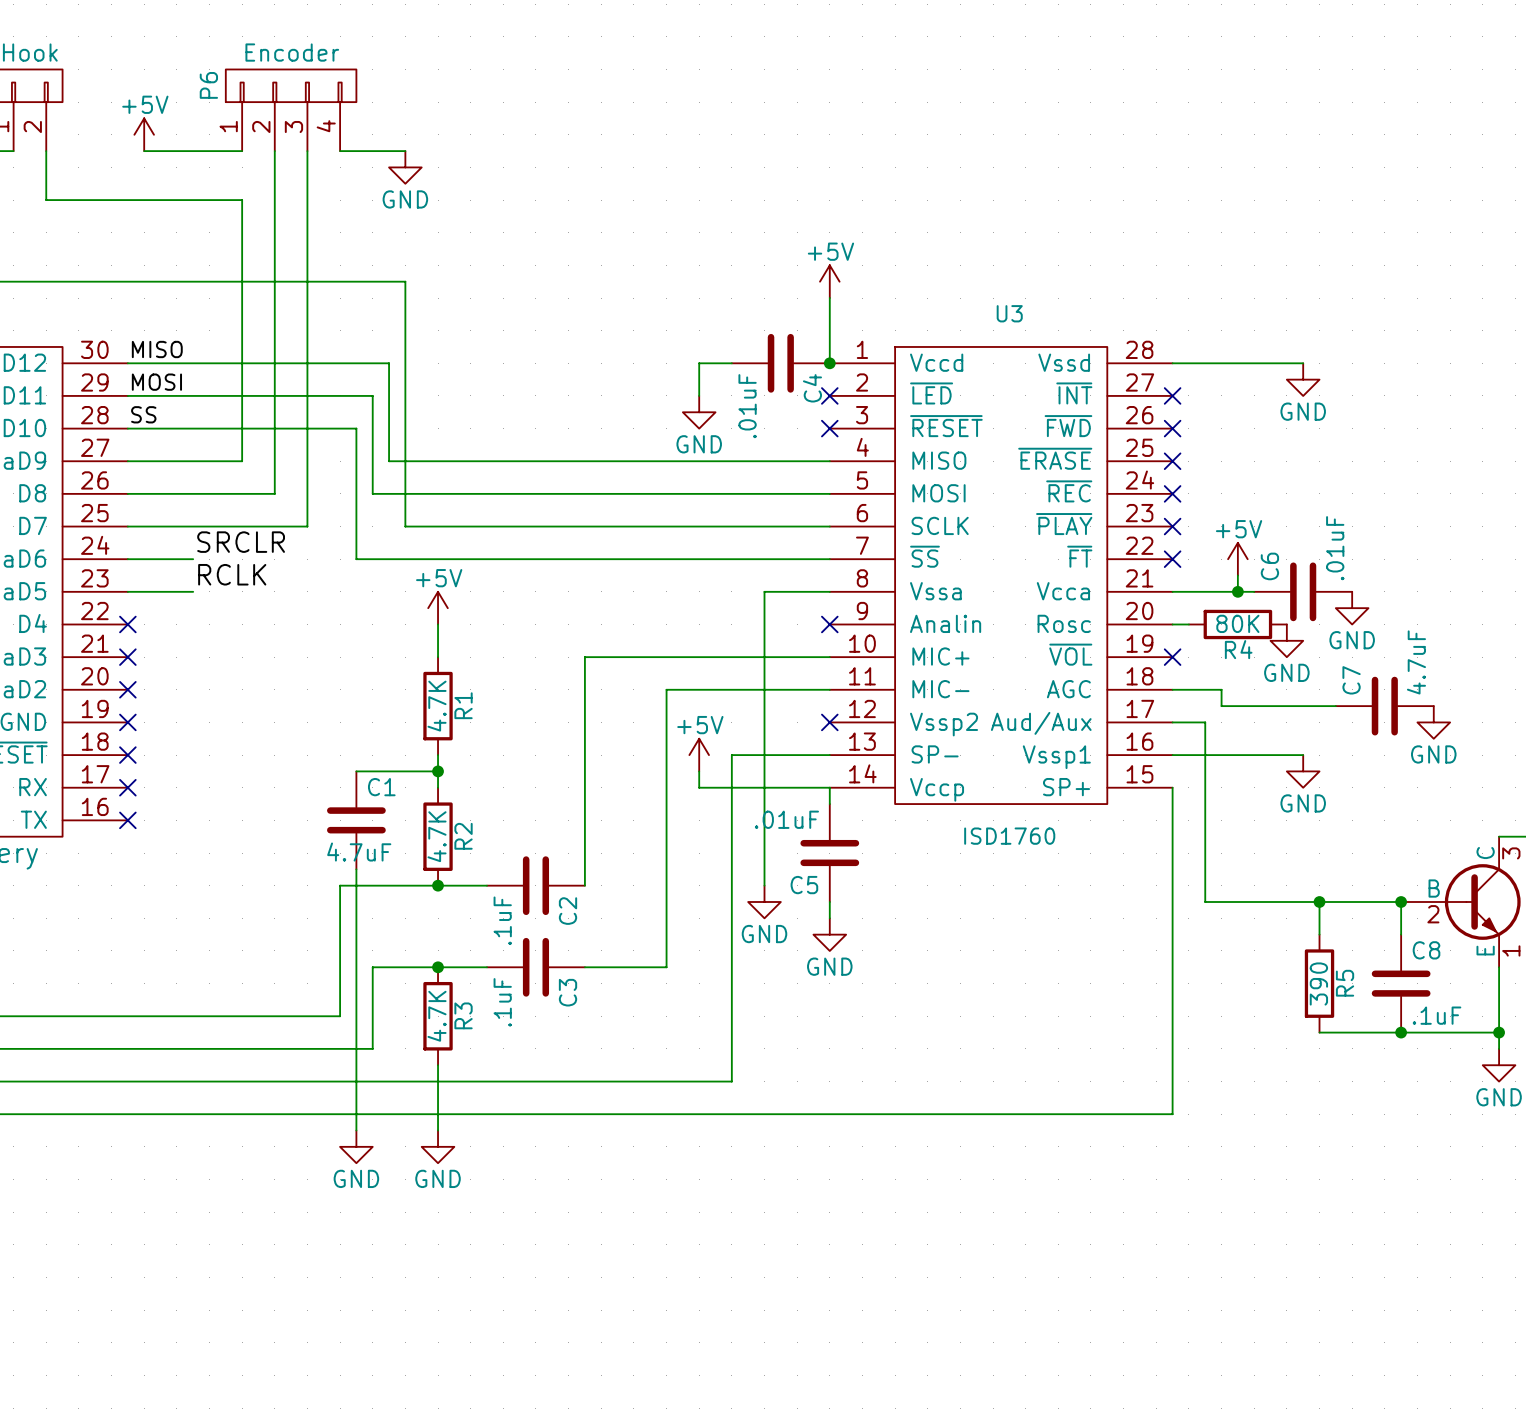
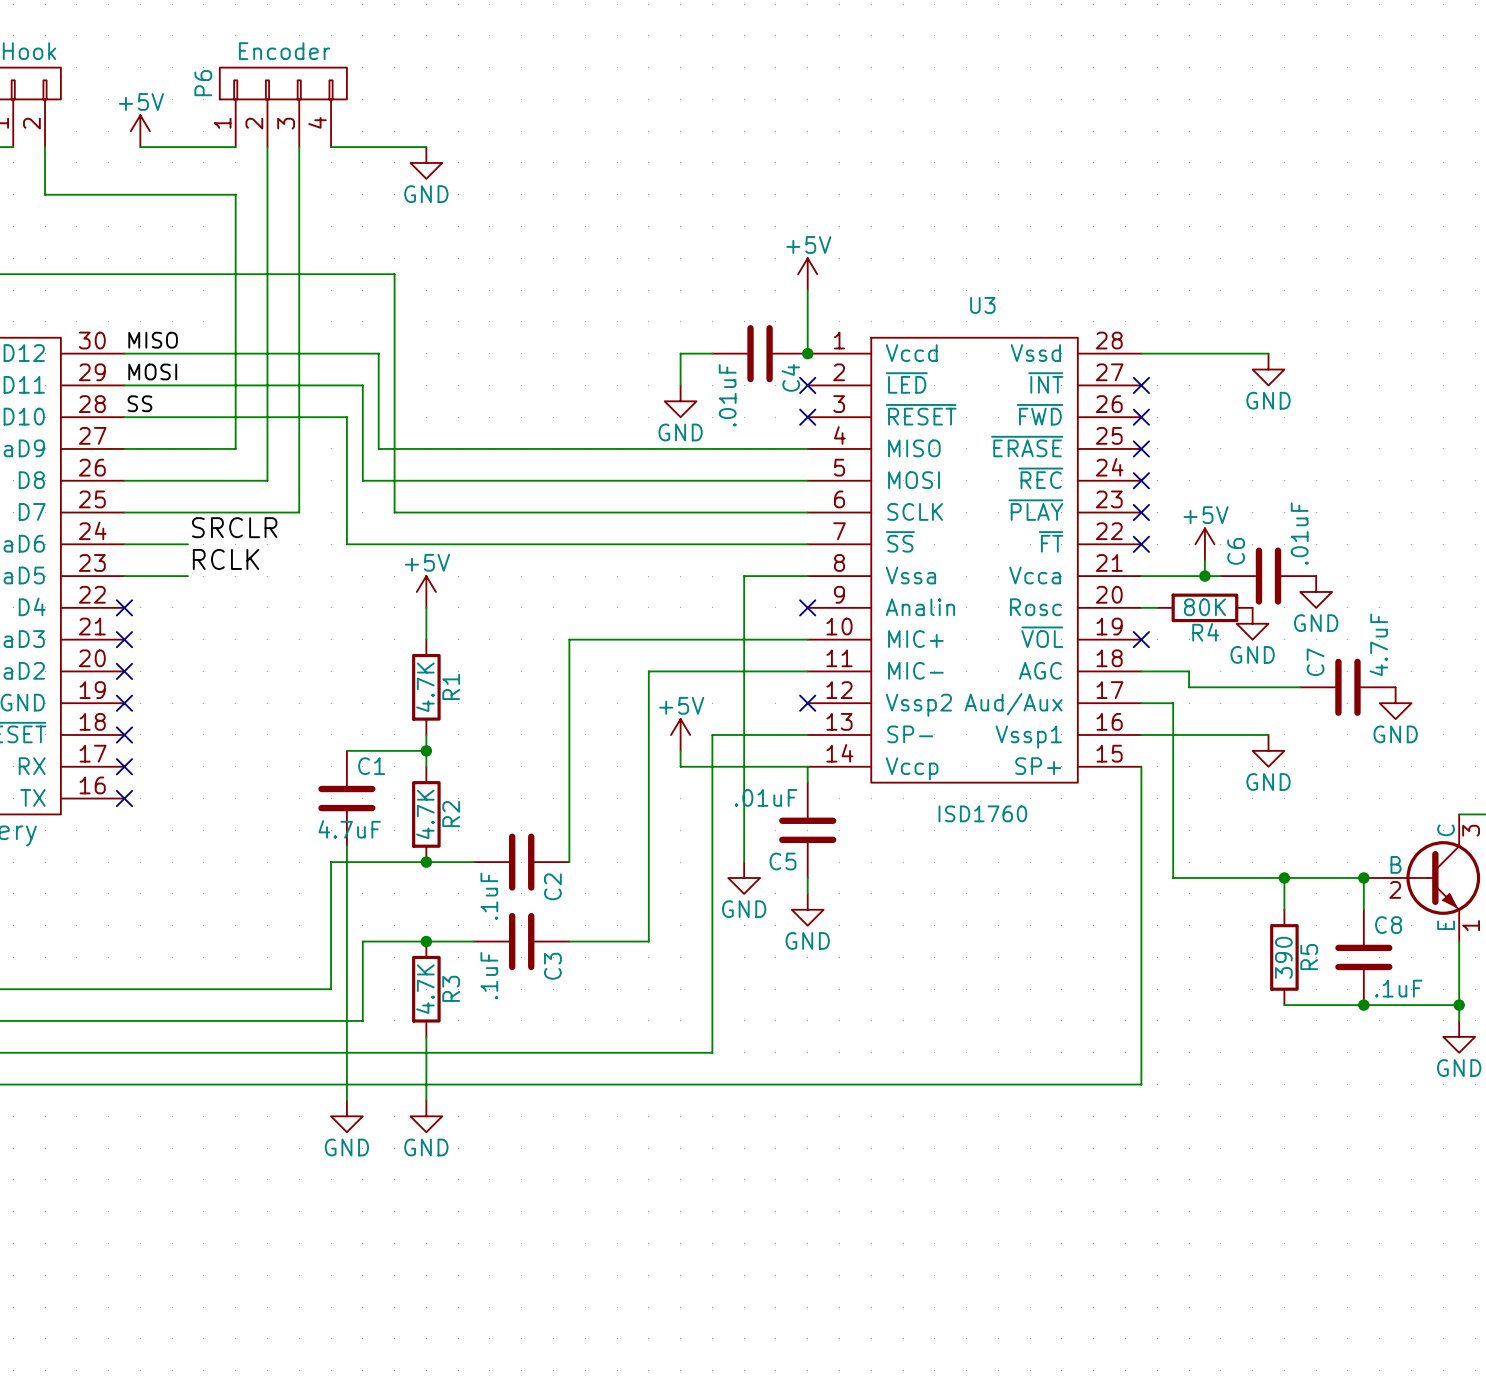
wire: none -> (394, 147) (426, 147)
power symbol position: GND (405, 167) -> GND (426, 162)

